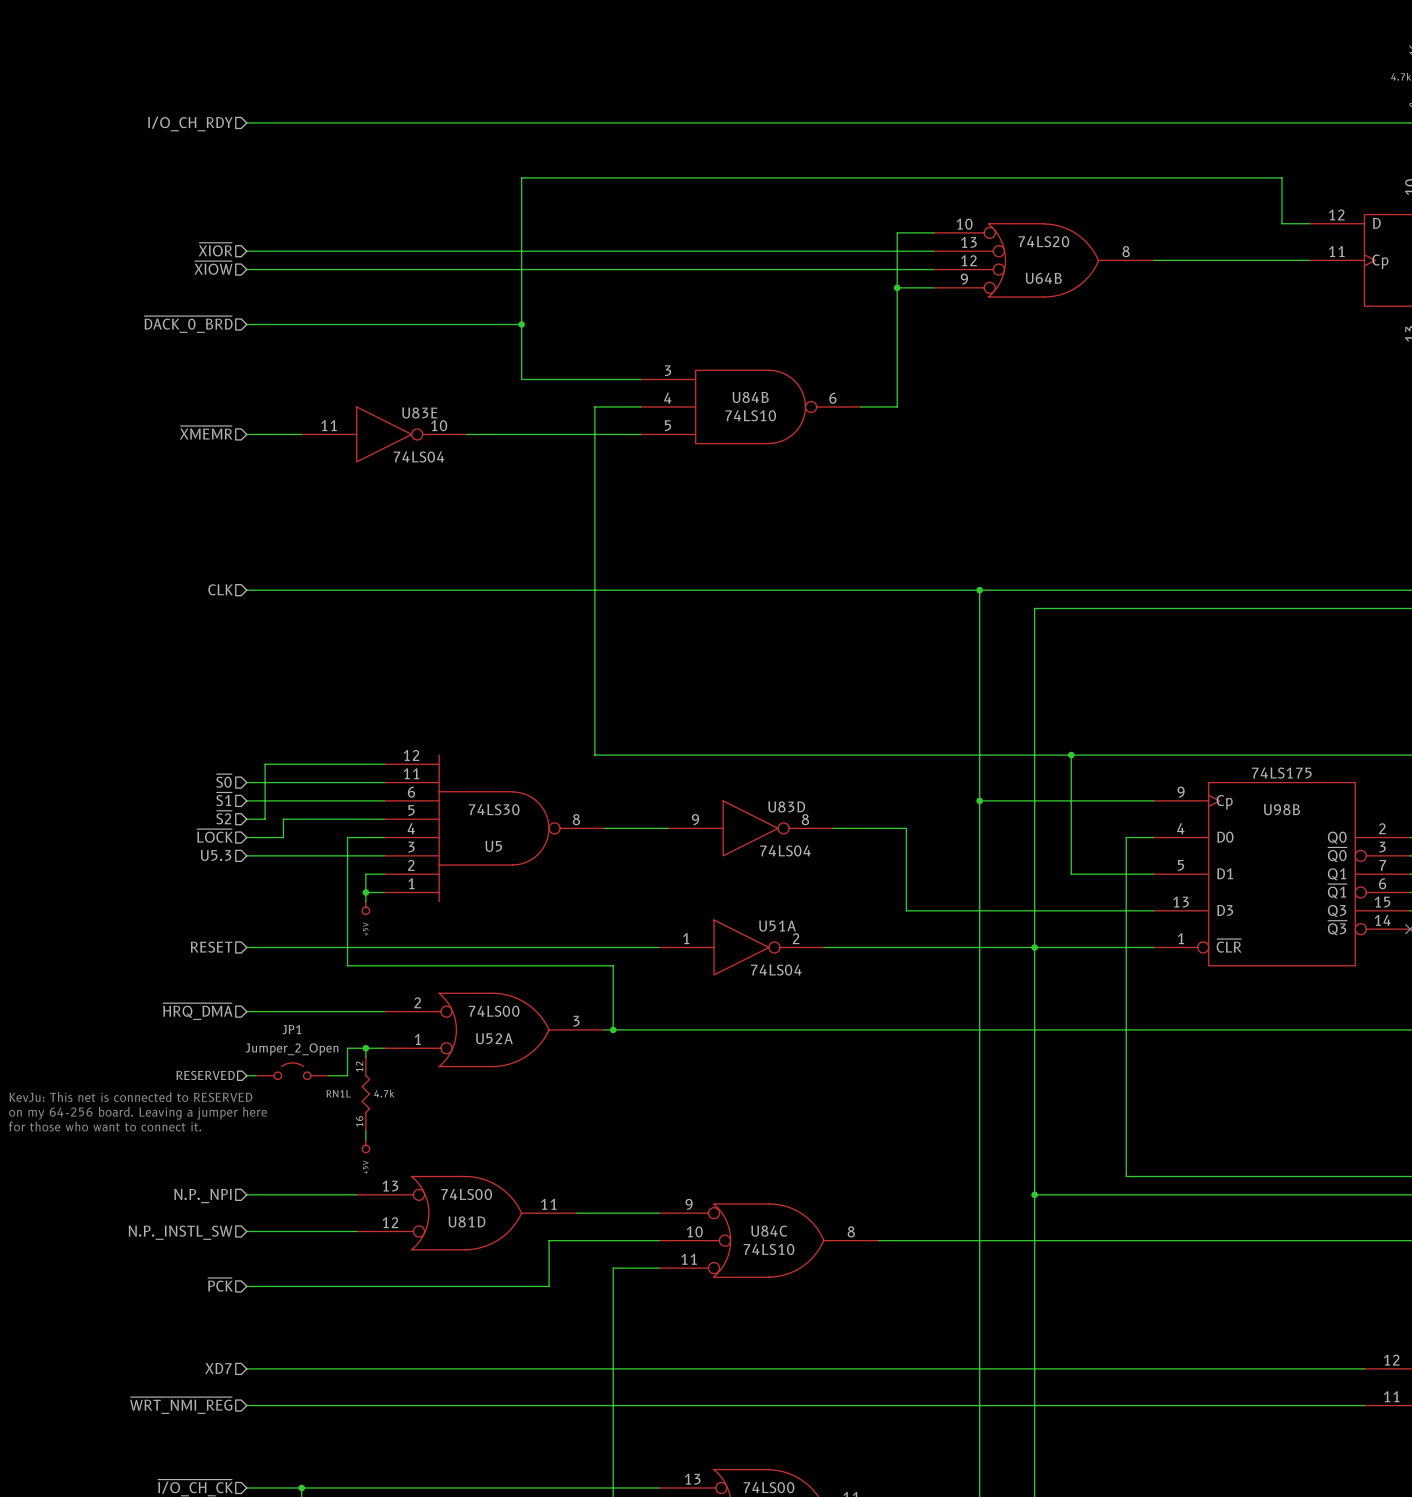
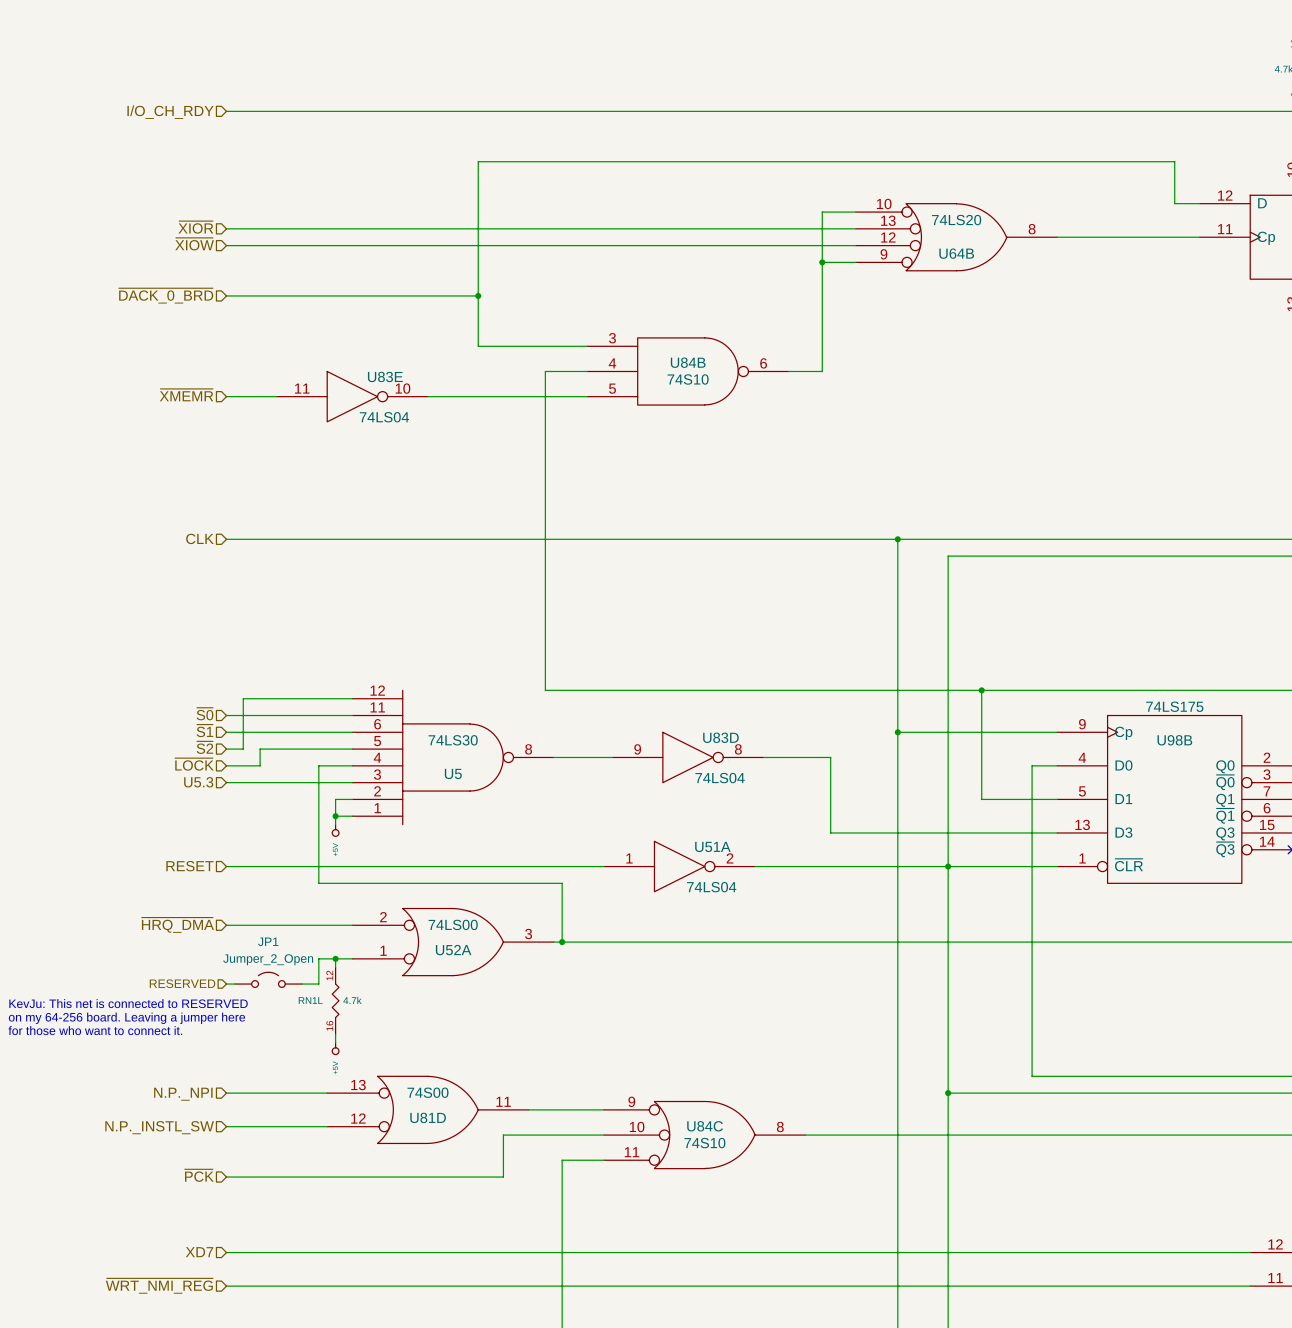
U84B value: 74LS10 (750, 415) -> 74S10 (688, 379)
U81D value: 74LS00 (466, 1194) -> 74S00 (427, 1092)
U84C value: 74LS10 (769, 1249) -> 74S10 (704, 1143)

